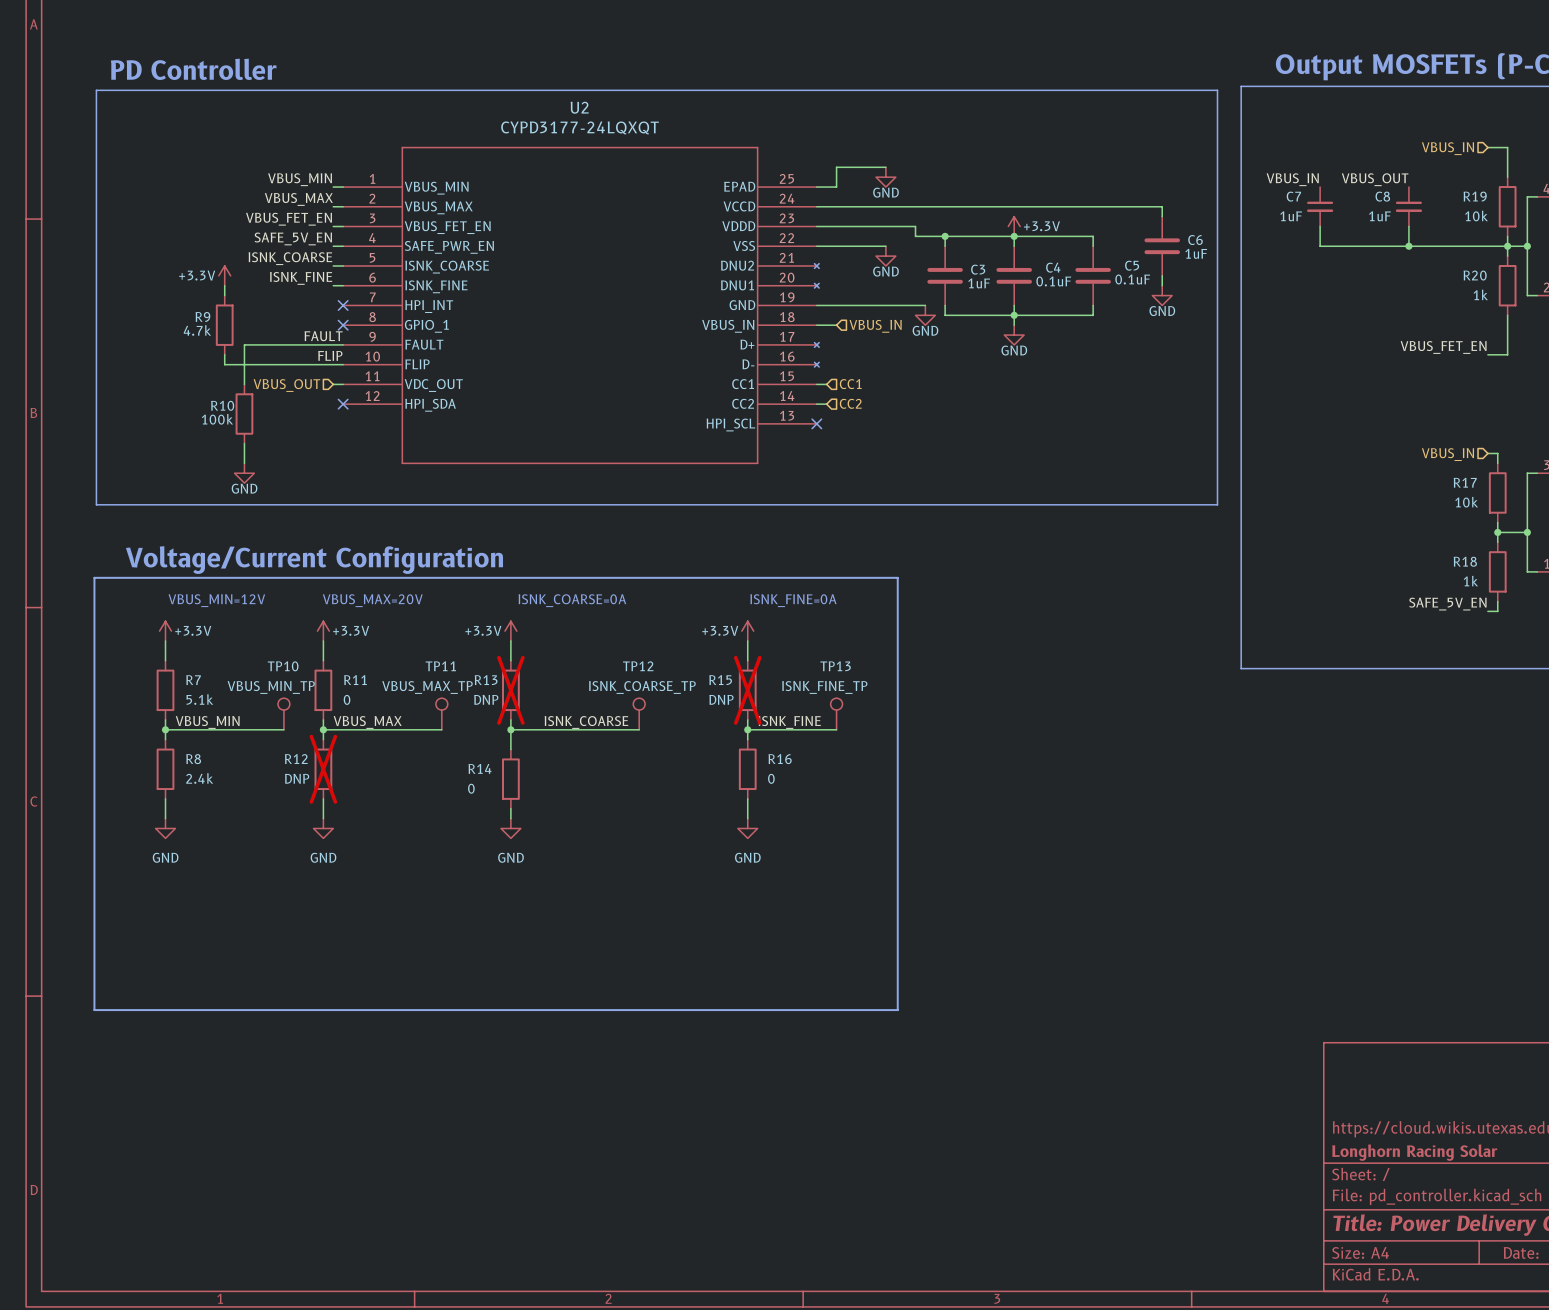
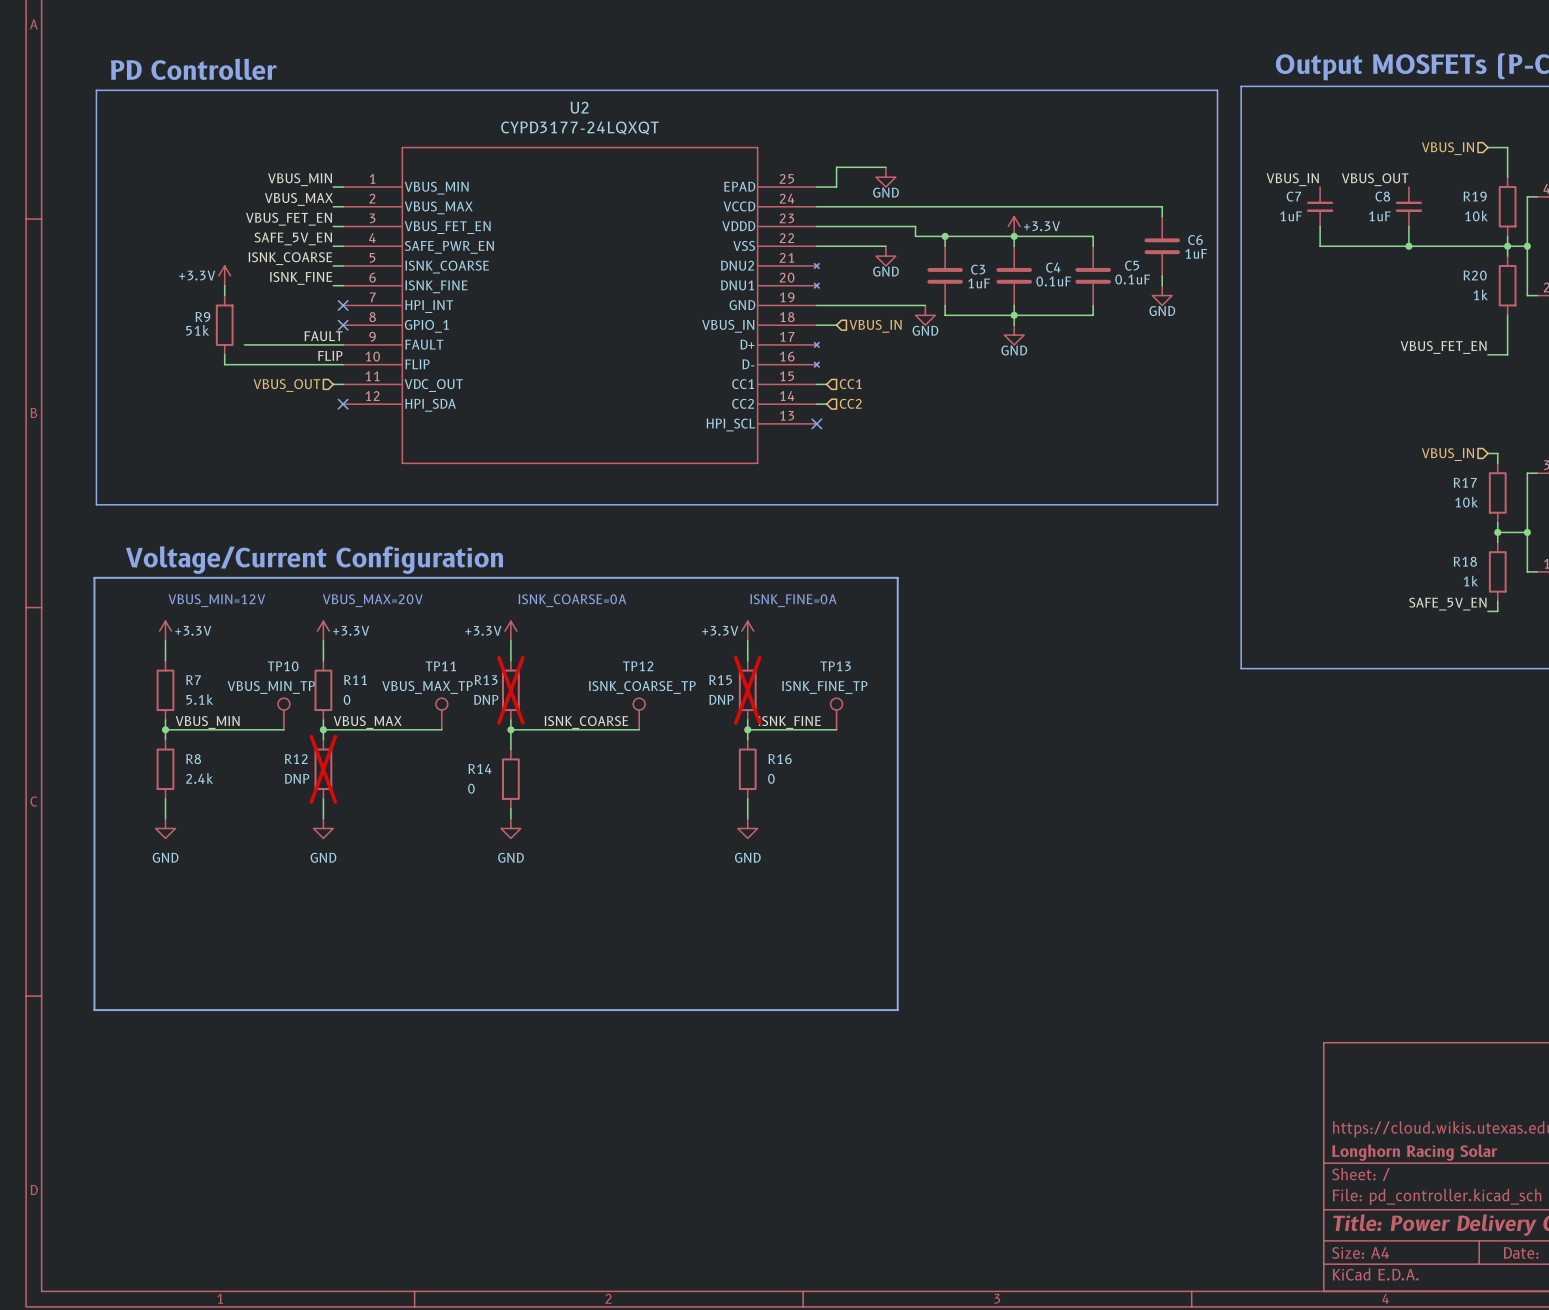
R9 value: 4.7k (197, 330) -> 51k (197, 330)
wire: (244, 344) (244, 384) -> none
R10: 100k (244, 414) -> none
wire: (244, 443) (244, 463) -> none
power symbol: GND (244, 473) -> none

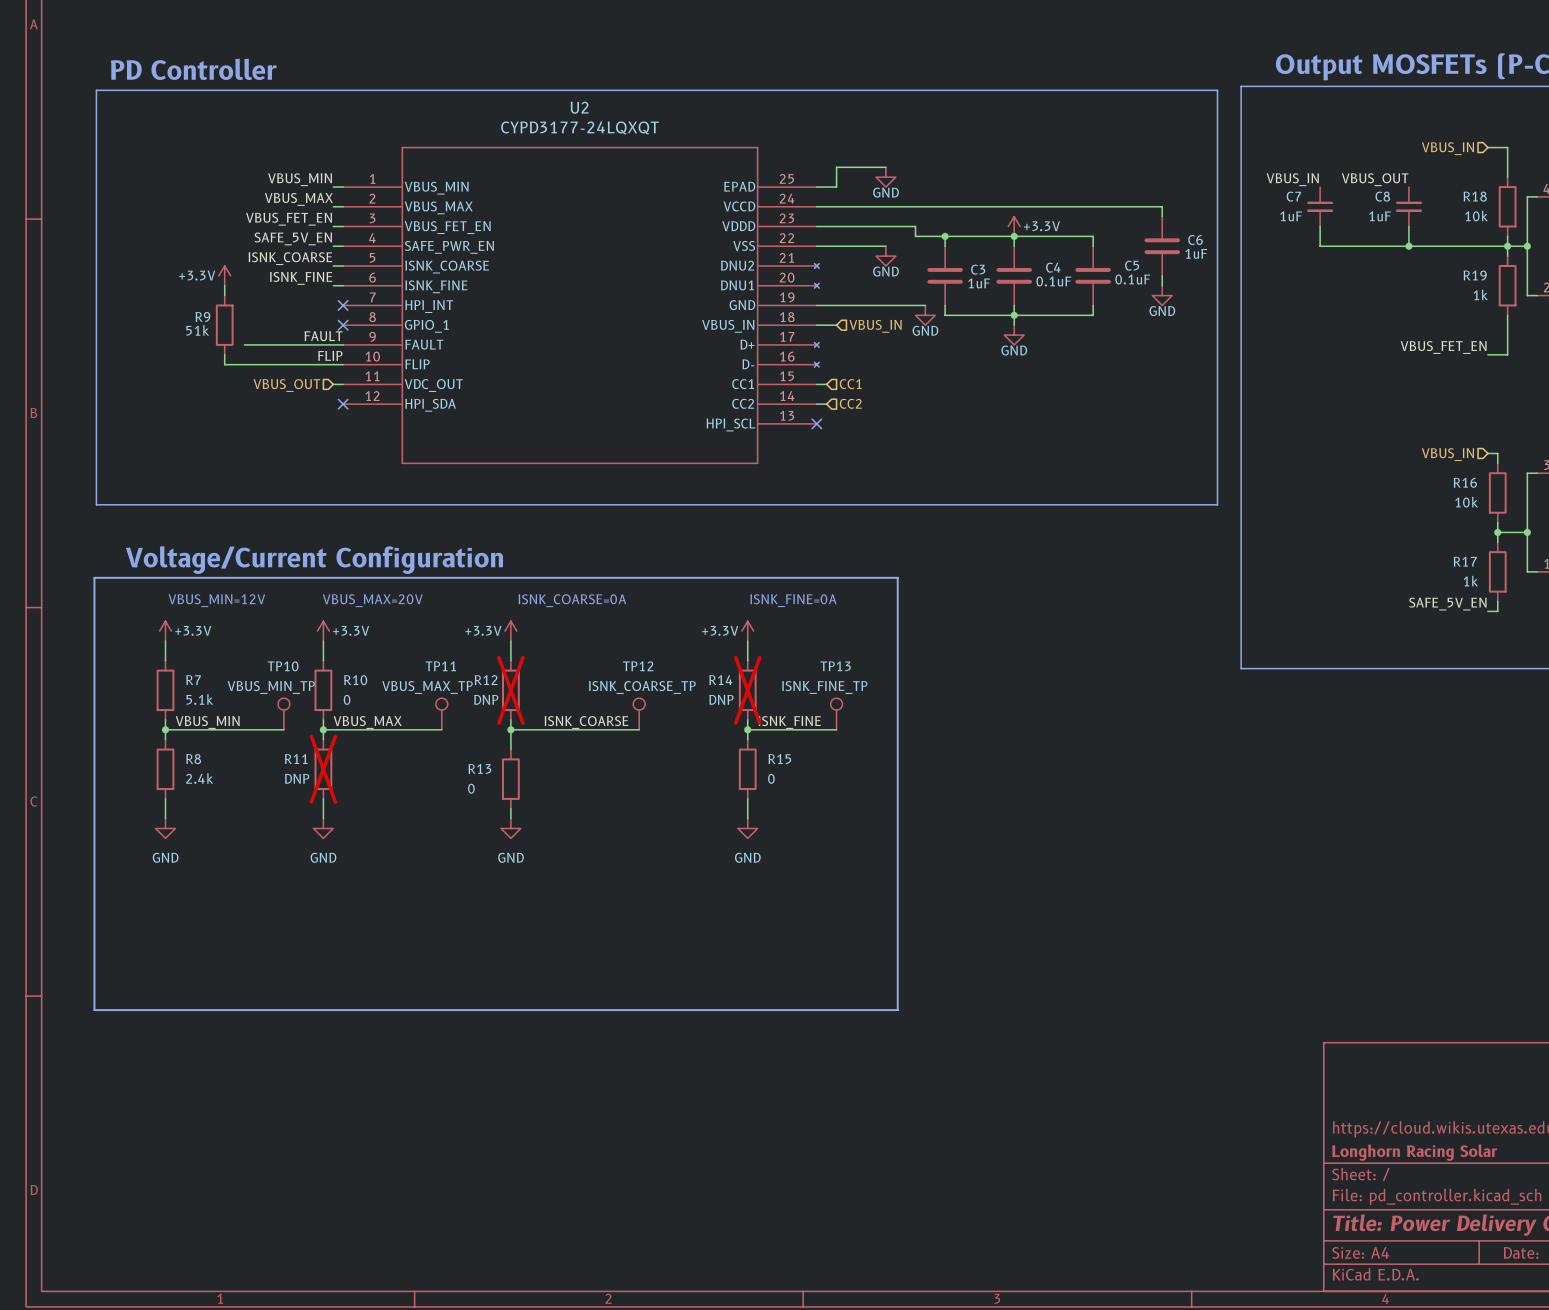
R19 name: R19 (1475, 196) -> R18 (1475, 196)
R20 name: R20 (1475, 275) -> R19 (1475, 275)
R17 name: R17 (1465, 482) -> R16 (1465, 482)
R18 name: R18 (1465, 561) -> R17 (1465, 561)
R11 name: R11 (355, 680) -> R10 (355, 680)
R13 name: R13 (486, 680) -> R12 (486, 680)
R15 name: R15 (720, 680) -> R14 (720, 680)
R12 name: R12 (296, 759) -> R11 (296, 759)
R16 name: R16 (780, 759) -> R15 (779, 759)
R14 name: R14 (479, 768) -> R13 (479, 768)

